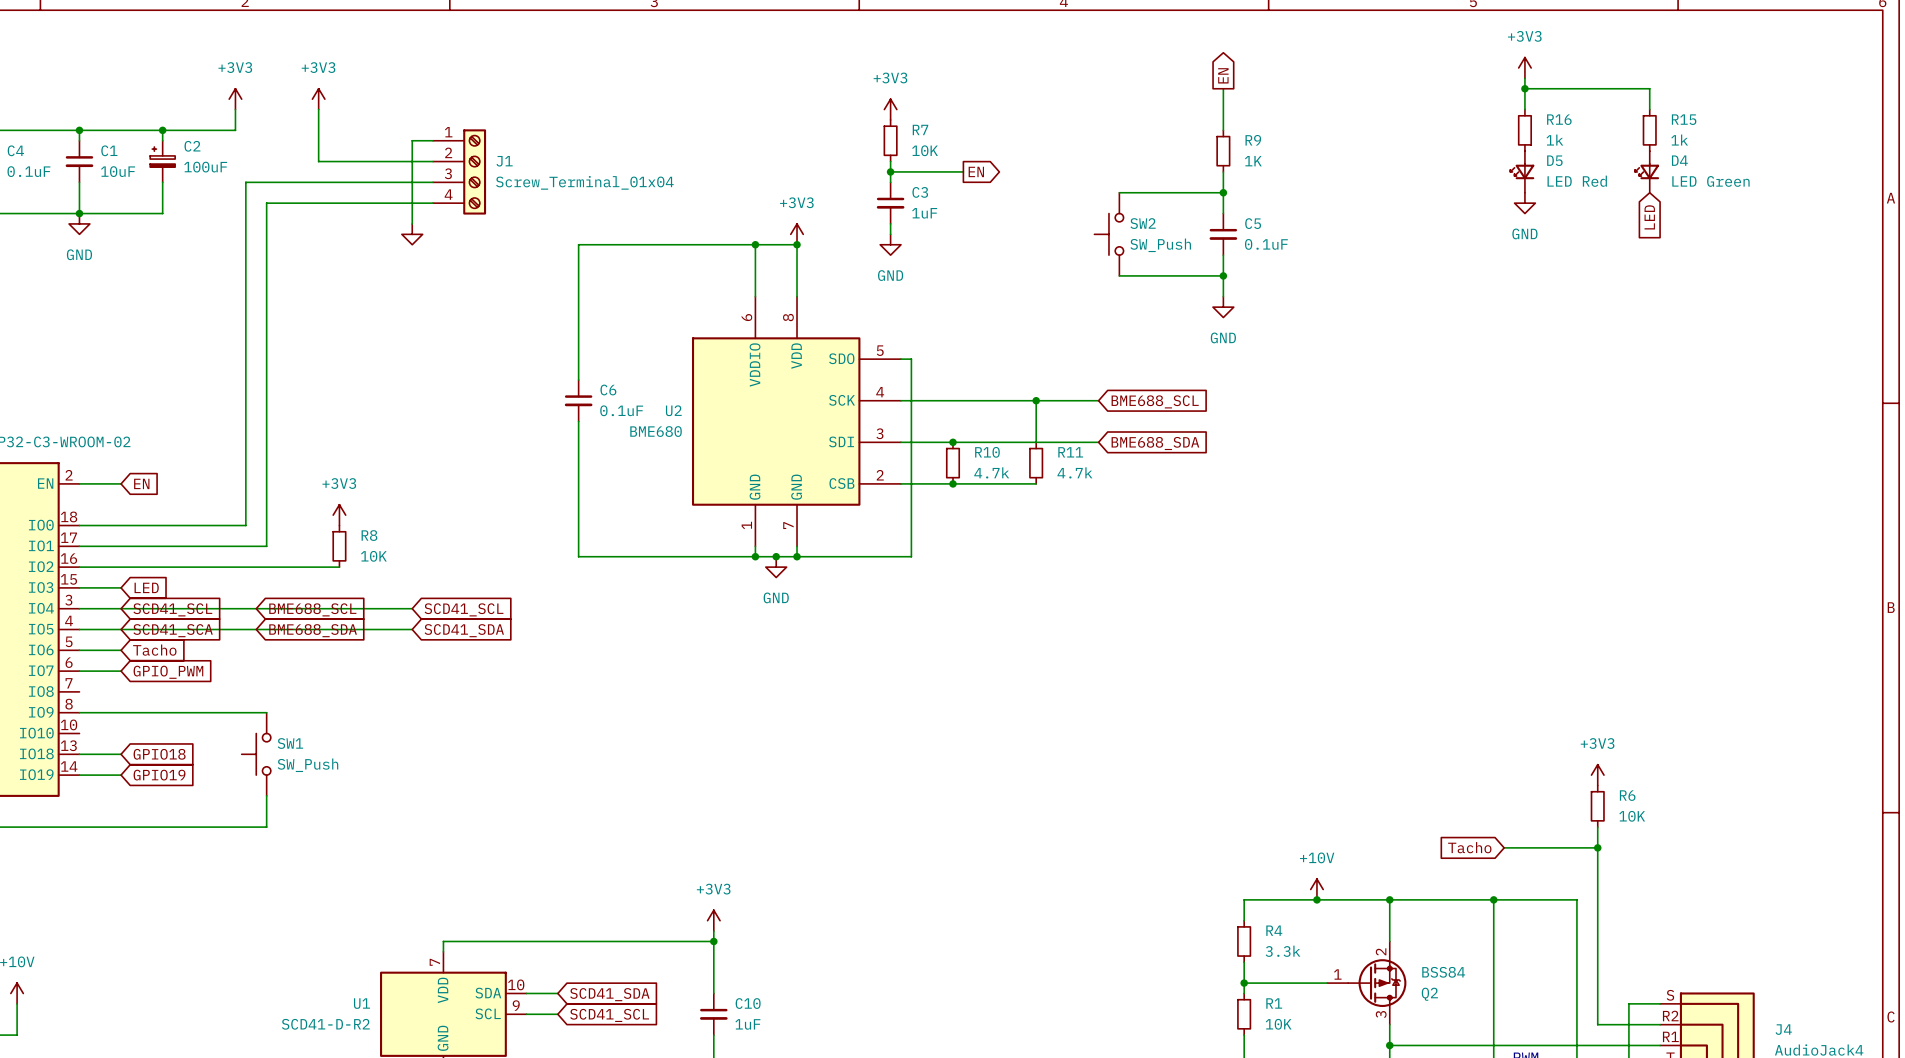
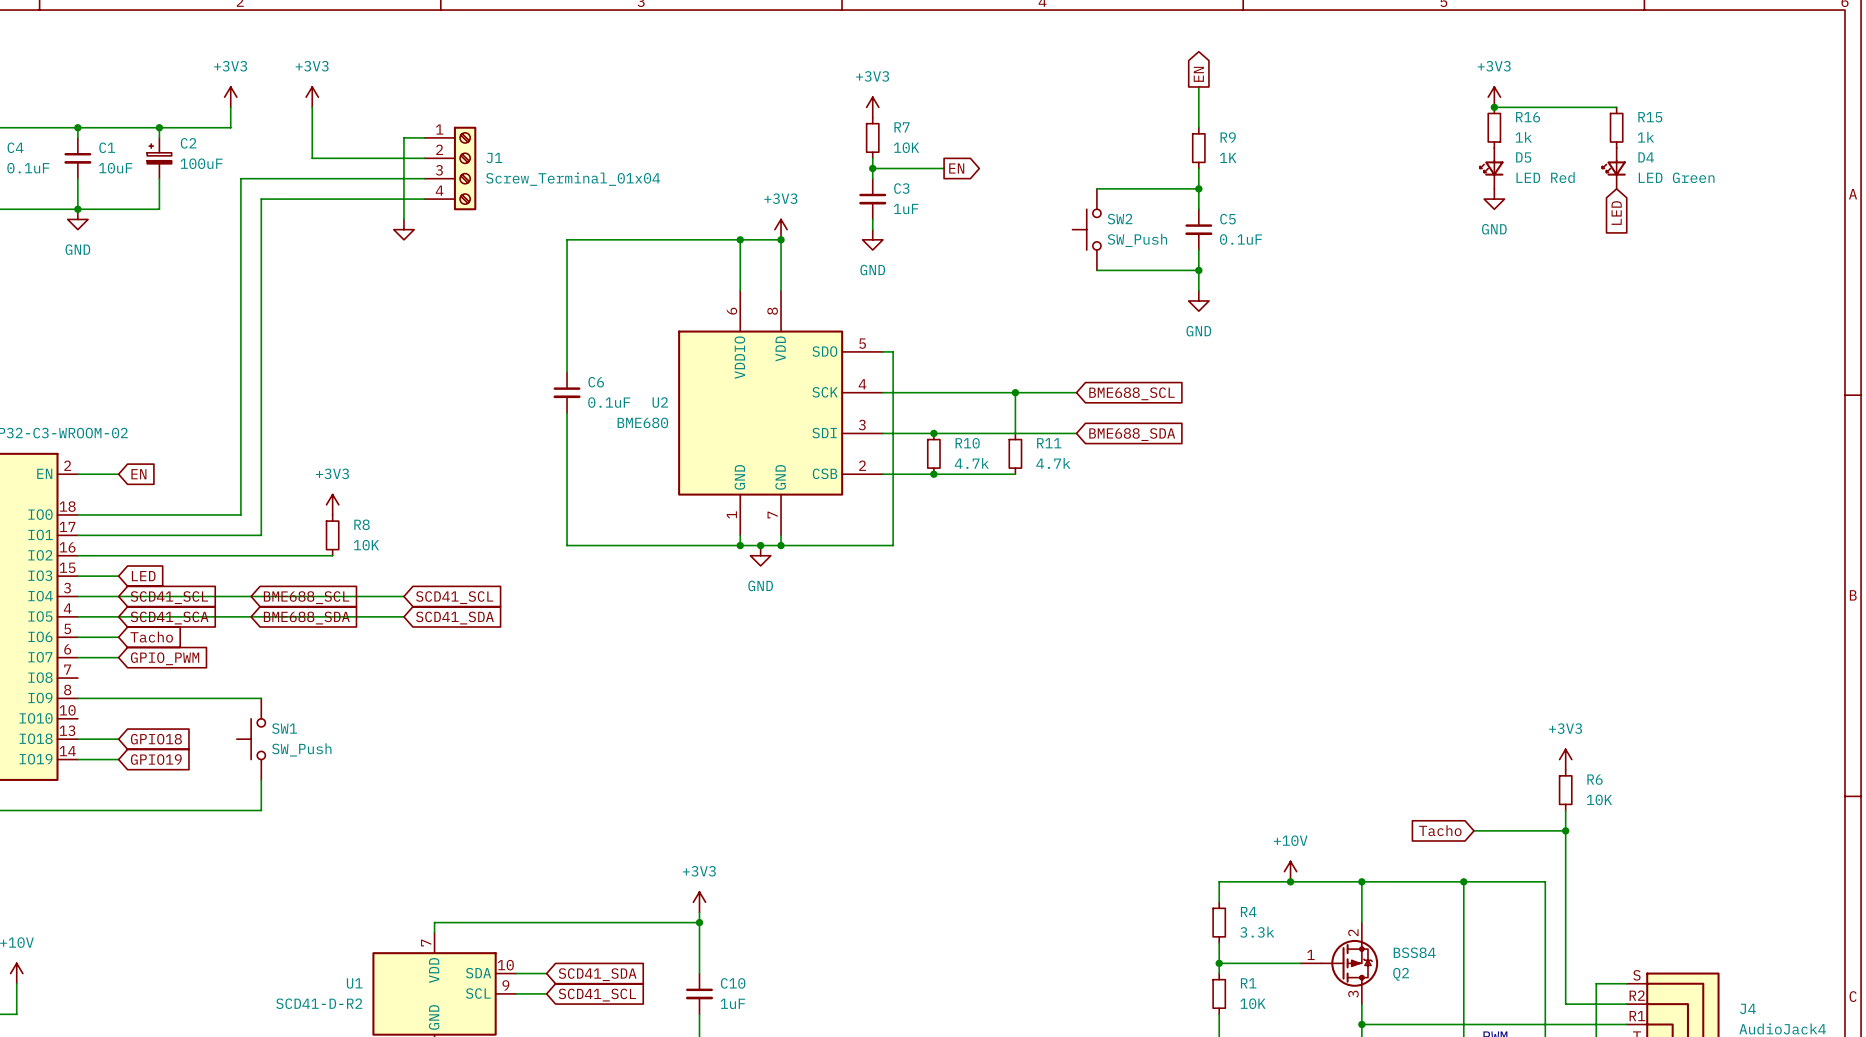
power symbol position: +3V3 (1524, 67) -> +3V3 (1494, 97)
wire: (1524, 88) (1649, 88) (1649, 109) -> (1494, 107) (1616, 107)
junction position: (1524, 88) -> (1494, 107)

